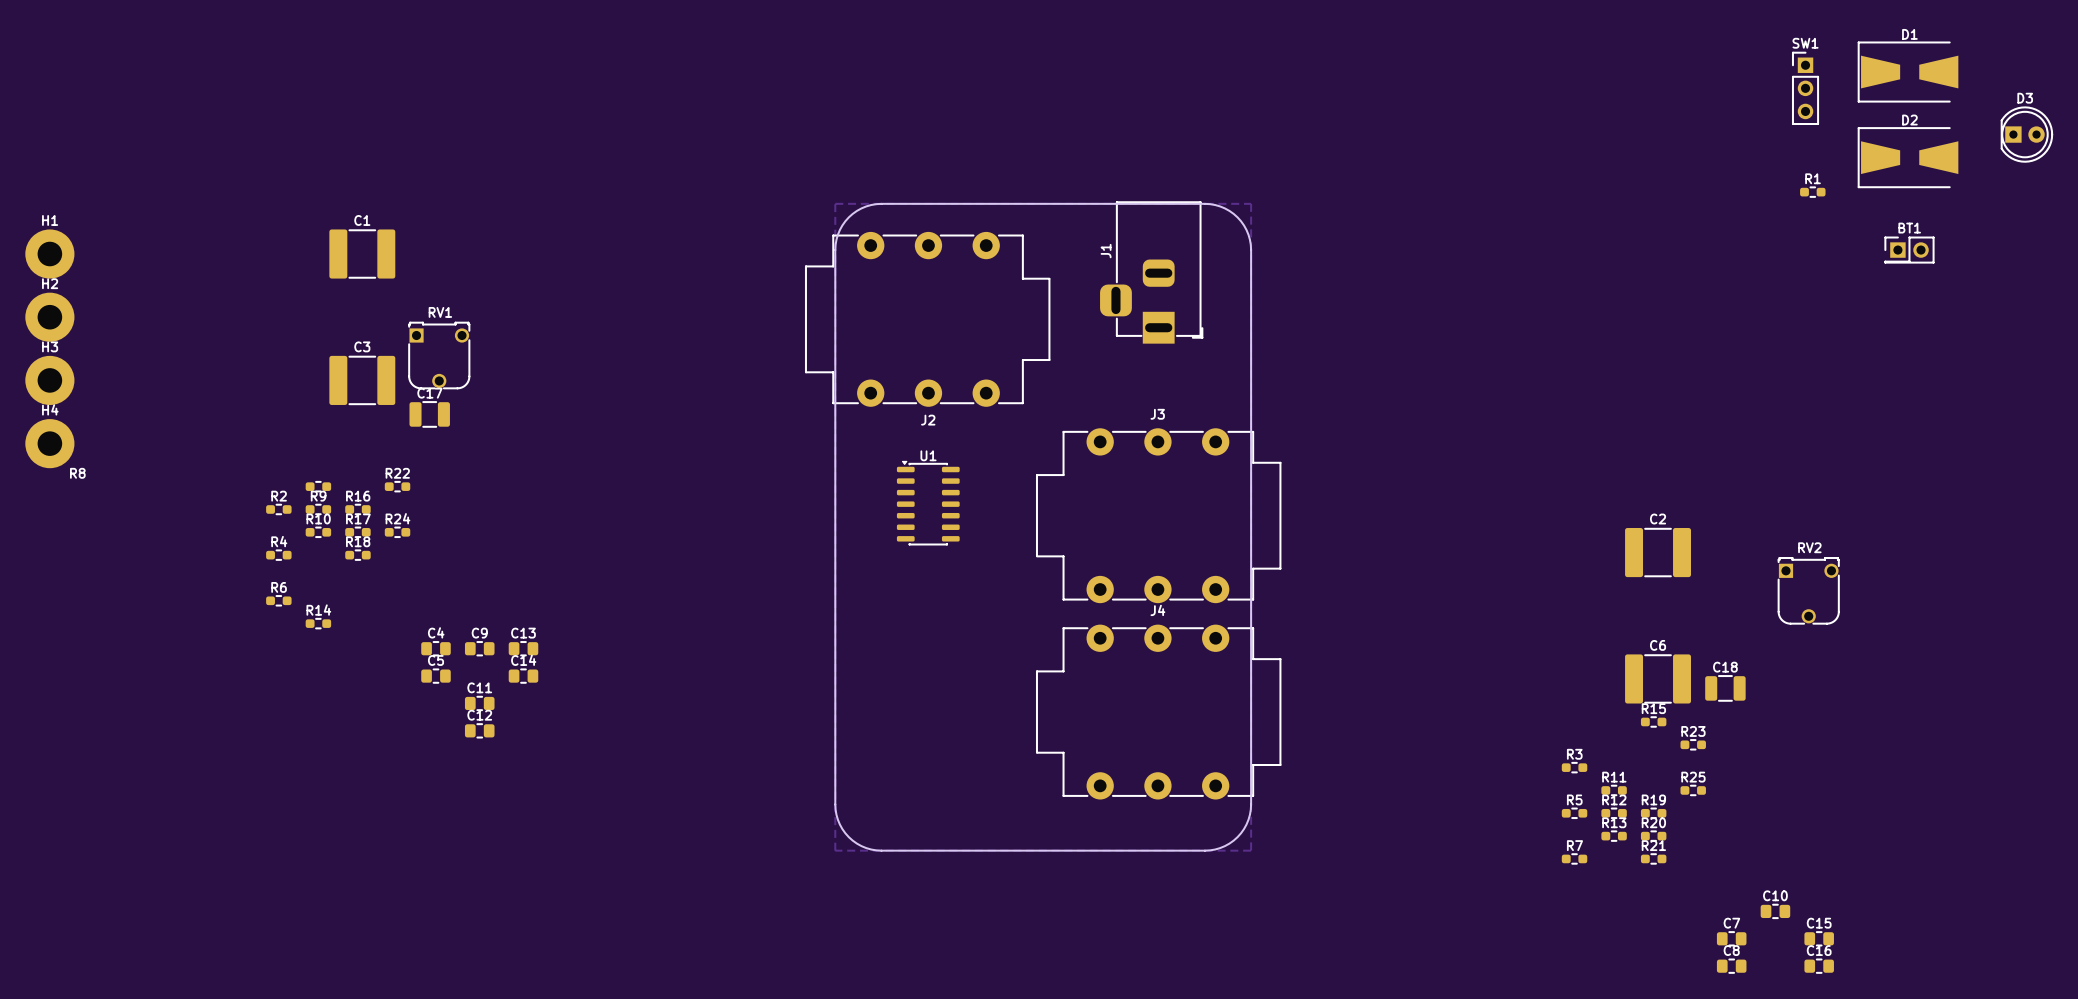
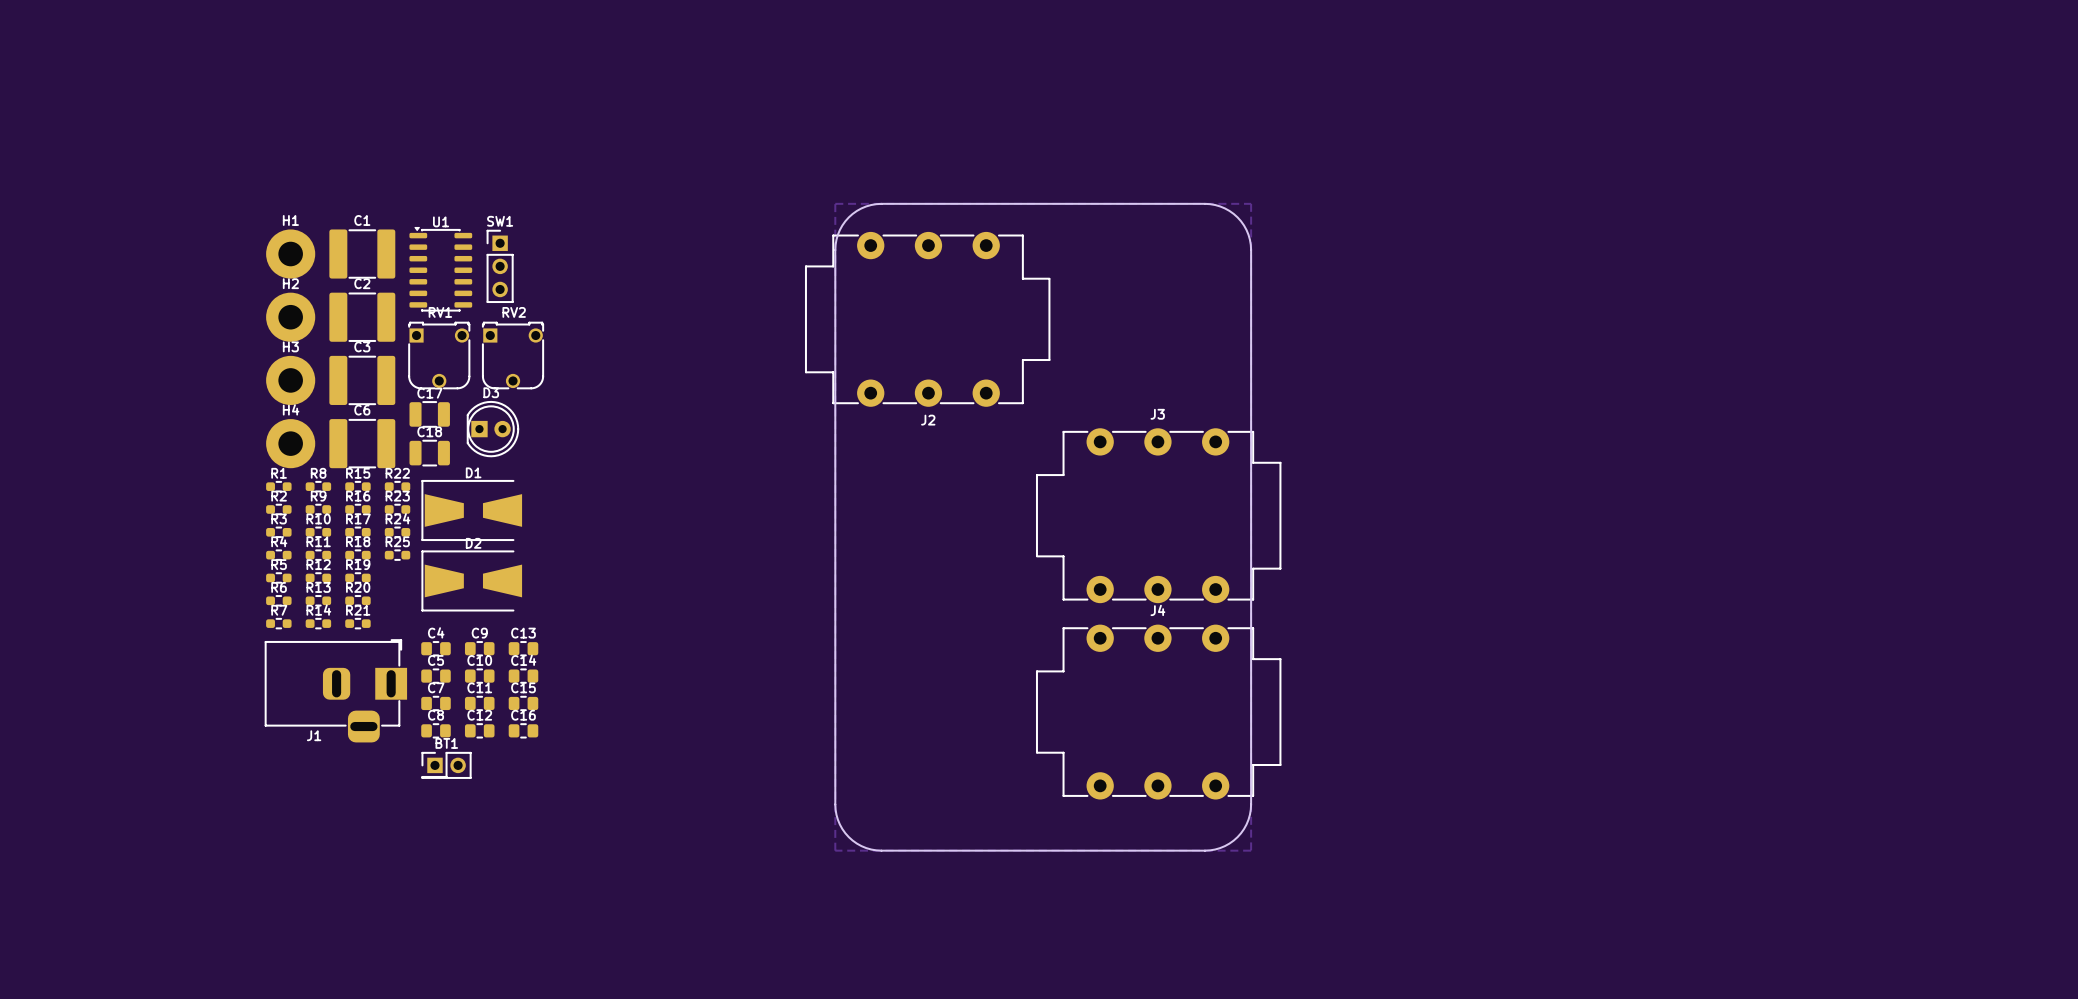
D1 position: (1908, 72) -> (471, 510)
SW1 position: (1805, 88) -> (500, 266)
D3 position: (2026, 134) -> (492, 429)
D2 position: (1908, 157) -> (471, 580)
R1 position: (1812, 192) -> (278, 486)
BT1 position: (1909, 250) -> (446, 765)
H1 position: (49, 254) -> (290, 254)
J1 rotation: 0° (1151, 272) -> 90° counterclockwise (336, 691)
J1 position: (1151, 272) -> (336, 691)
H2 position: (49, 317) -> (290, 317)
H3 position: (49, 380) -> (290, 380)
H4 position: (49, 443) -> (290, 443)
R8 name position: R8 (77, 473) -> R8 (318, 473)
U1 position: (928, 502) -> (440, 269)
C2 position: (1658, 552) -> (362, 317)
RV2 position: (1808, 590) -> (513, 355)
C6 position: (1658, 678) -> (362, 443)
C18 position: (1725, 688) -> (429, 453)
R15 position: (1653, 721) -> (357, 486)
R23 position: (1693, 744) -> (397, 509)
R3 position: (1574, 767) -> (278, 532)
R11 position: (1614, 790) -> (318, 555)
R25 position: (1693, 790) -> (397, 555)
R5 position: (1574, 813) -> (278, 577)
R12 position: (1614, 813) -> (318, 577)
R19 position: (1653, 813) -> (357, 577)
R13 position: (1614, 836) -> (318, 600)
R20 position: (1653, 836) -> (357, 600)
R7 position: (1574, 858) -> (278, 623)
R21 position: (1653, 858) -> (357, 623)
C10 position: (1775, 911) -> (479, 676)
C7 position: (1731, 938) -> (435, 703)
C15 position: (1819, 938) -> (523, 703)
C8 position: (1731, 966) -> (435, 730)
C16 position: (1819, 966) -> (523, 730)

